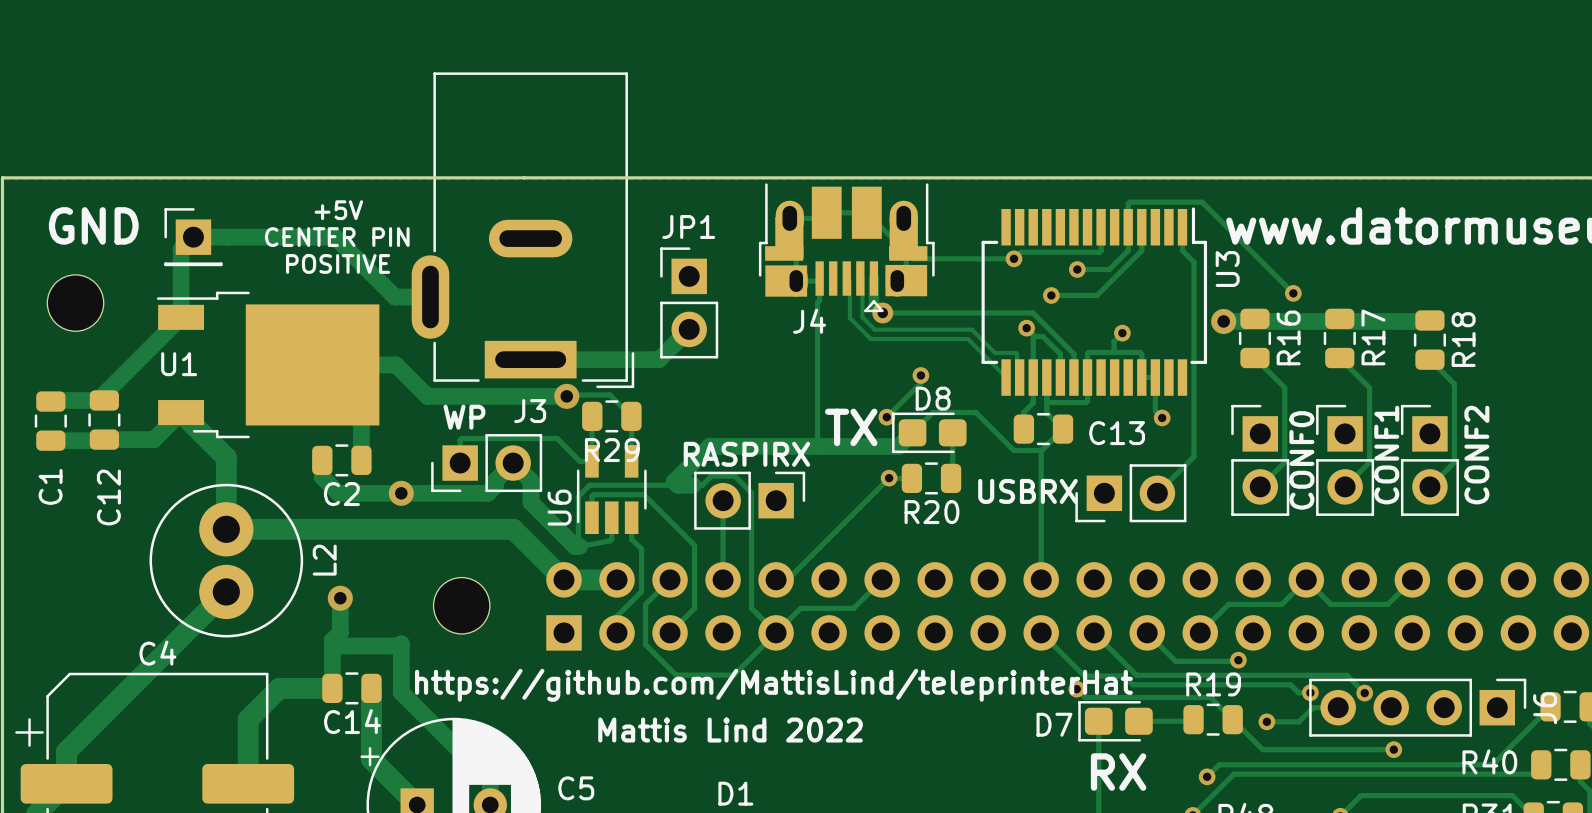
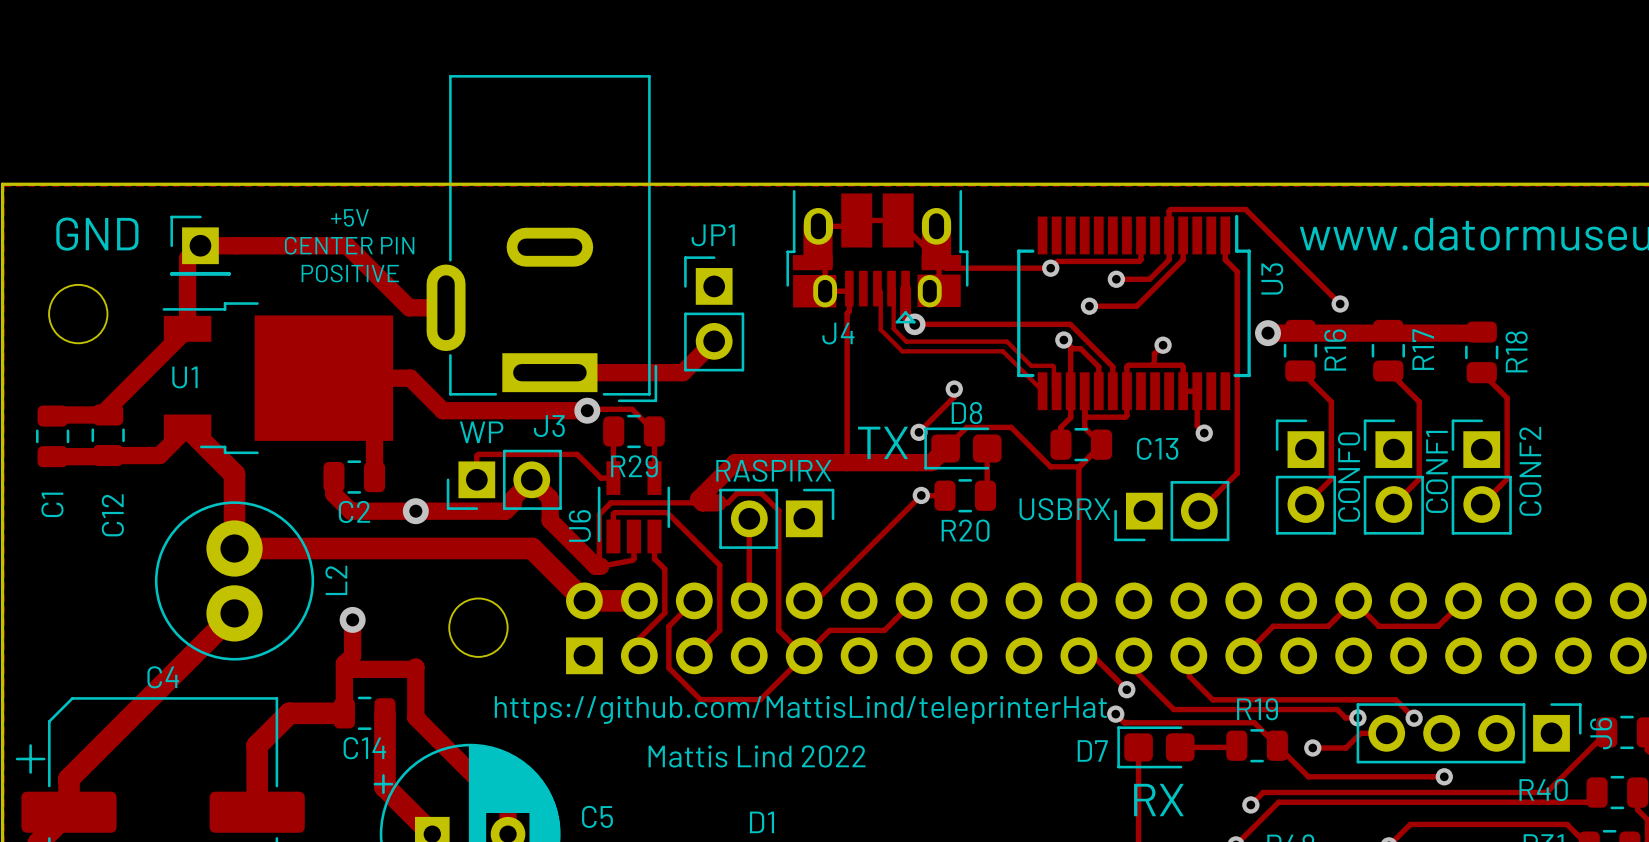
track: (1041, 632) (1084, 675) (1124, 675) -> (1078, 655) (1092, 655) (1126, 689)
track: (1094, 632) (1136, 675) (1170, 675) -> (1133, 655) (1133, 669) (1164, 700)
track: (1147, 633) (1175, 661) (1238, 660) -> (1189, 656) (1189, 676) (1212, 699)
via: (1238, 660) -> none
via: none -> (1126, 689)

